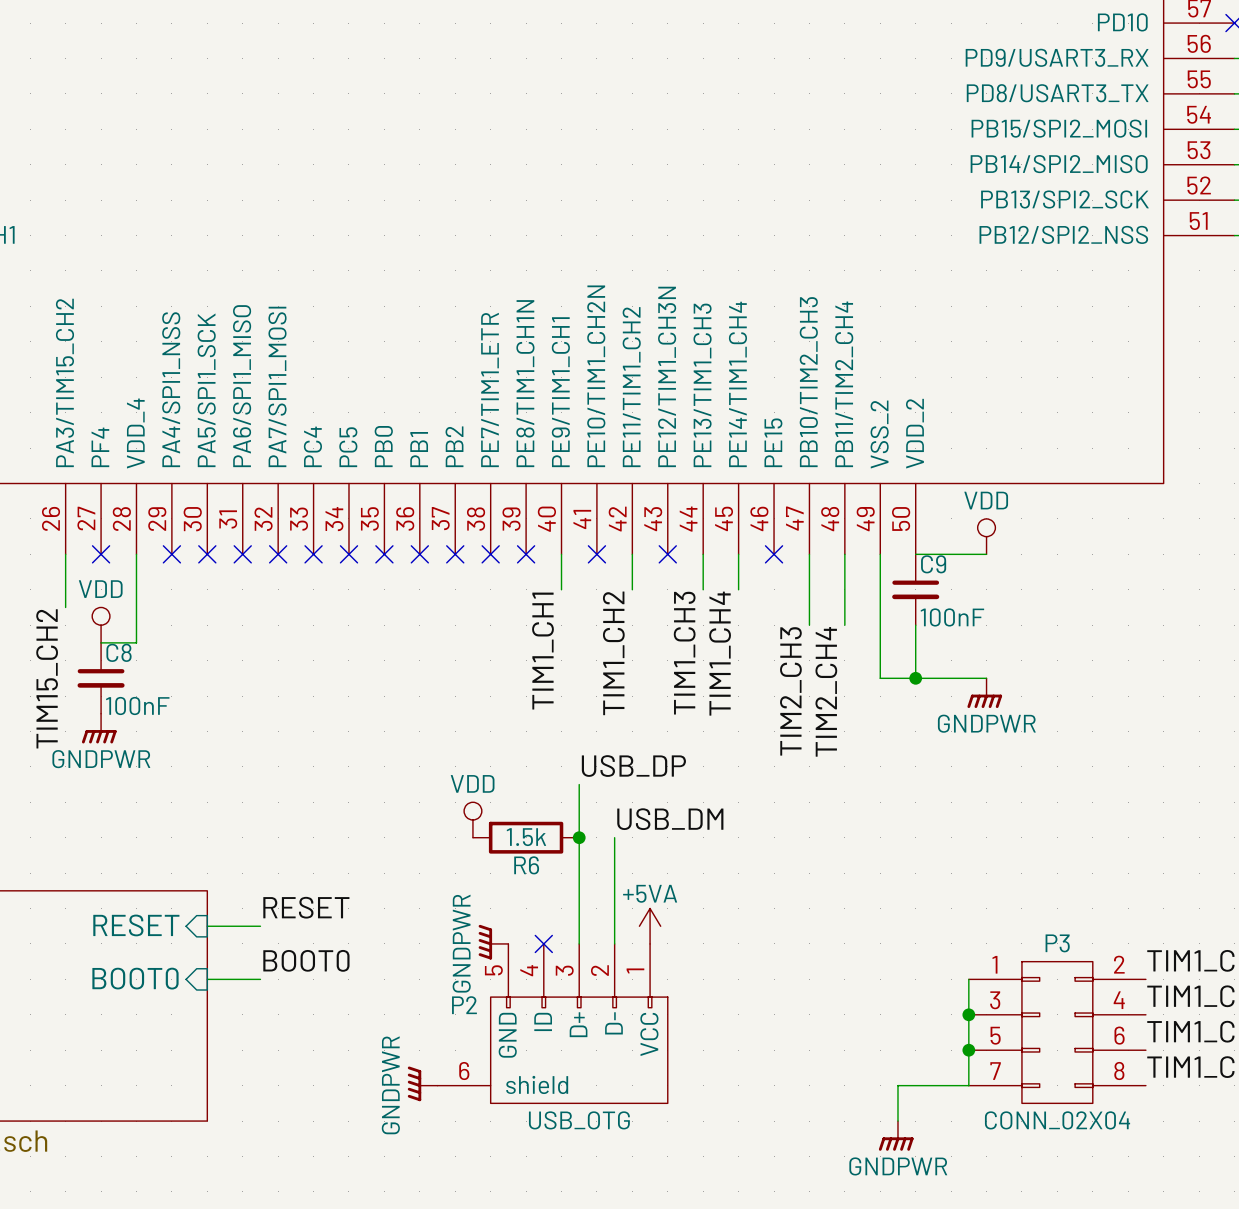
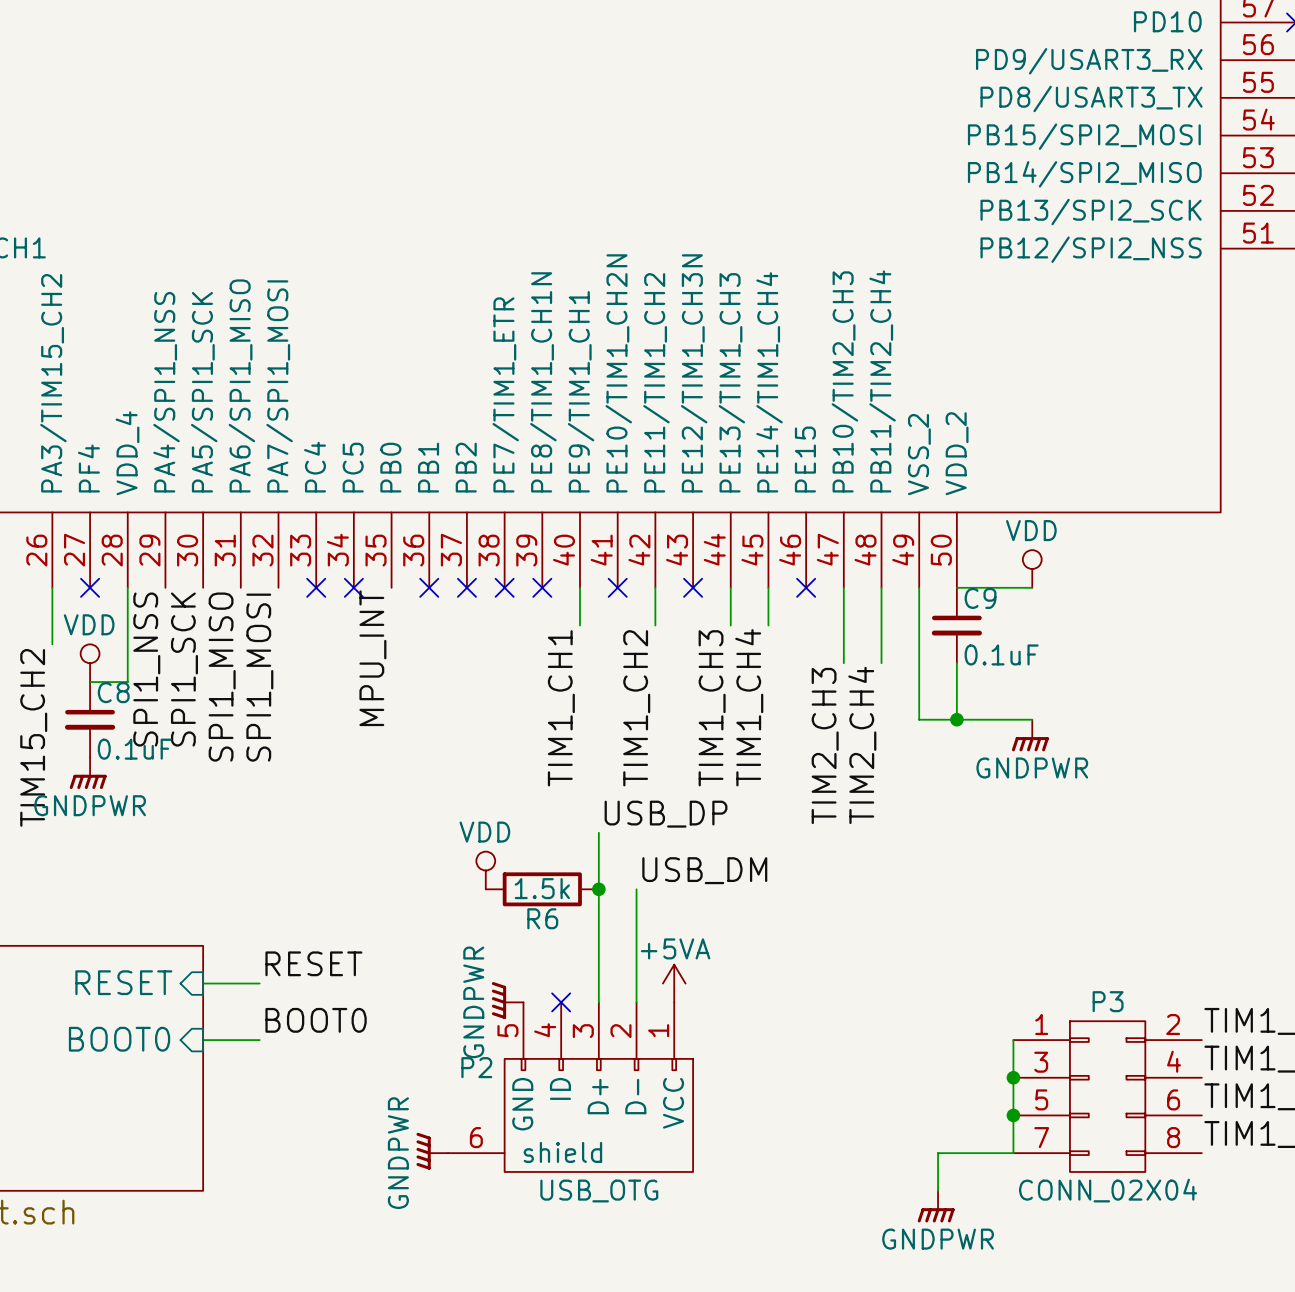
no-connect mark: (171, 554) -> none
no-connect mark: (207, 554) -> none
no-connect mark: (242, 554) -> none
no-connect mark: (278, 554) -> none
no-connect mark: (384, 554) -> none
label: none -> MPU_INT (372, 658)
label: none -> SPI1_SCK (184, 669)
label: none -> SPI1_NSS (146, 669)
C9 value: 100nF (952, 617) -> 0.1uF (1001, 654)
label: none -> SPI1_MISO (222, 677)
label: none -> SPI1_MOSI (259, 677)
C8 value: 100nF (137, 706) -> 0.1uF (134, 749)

